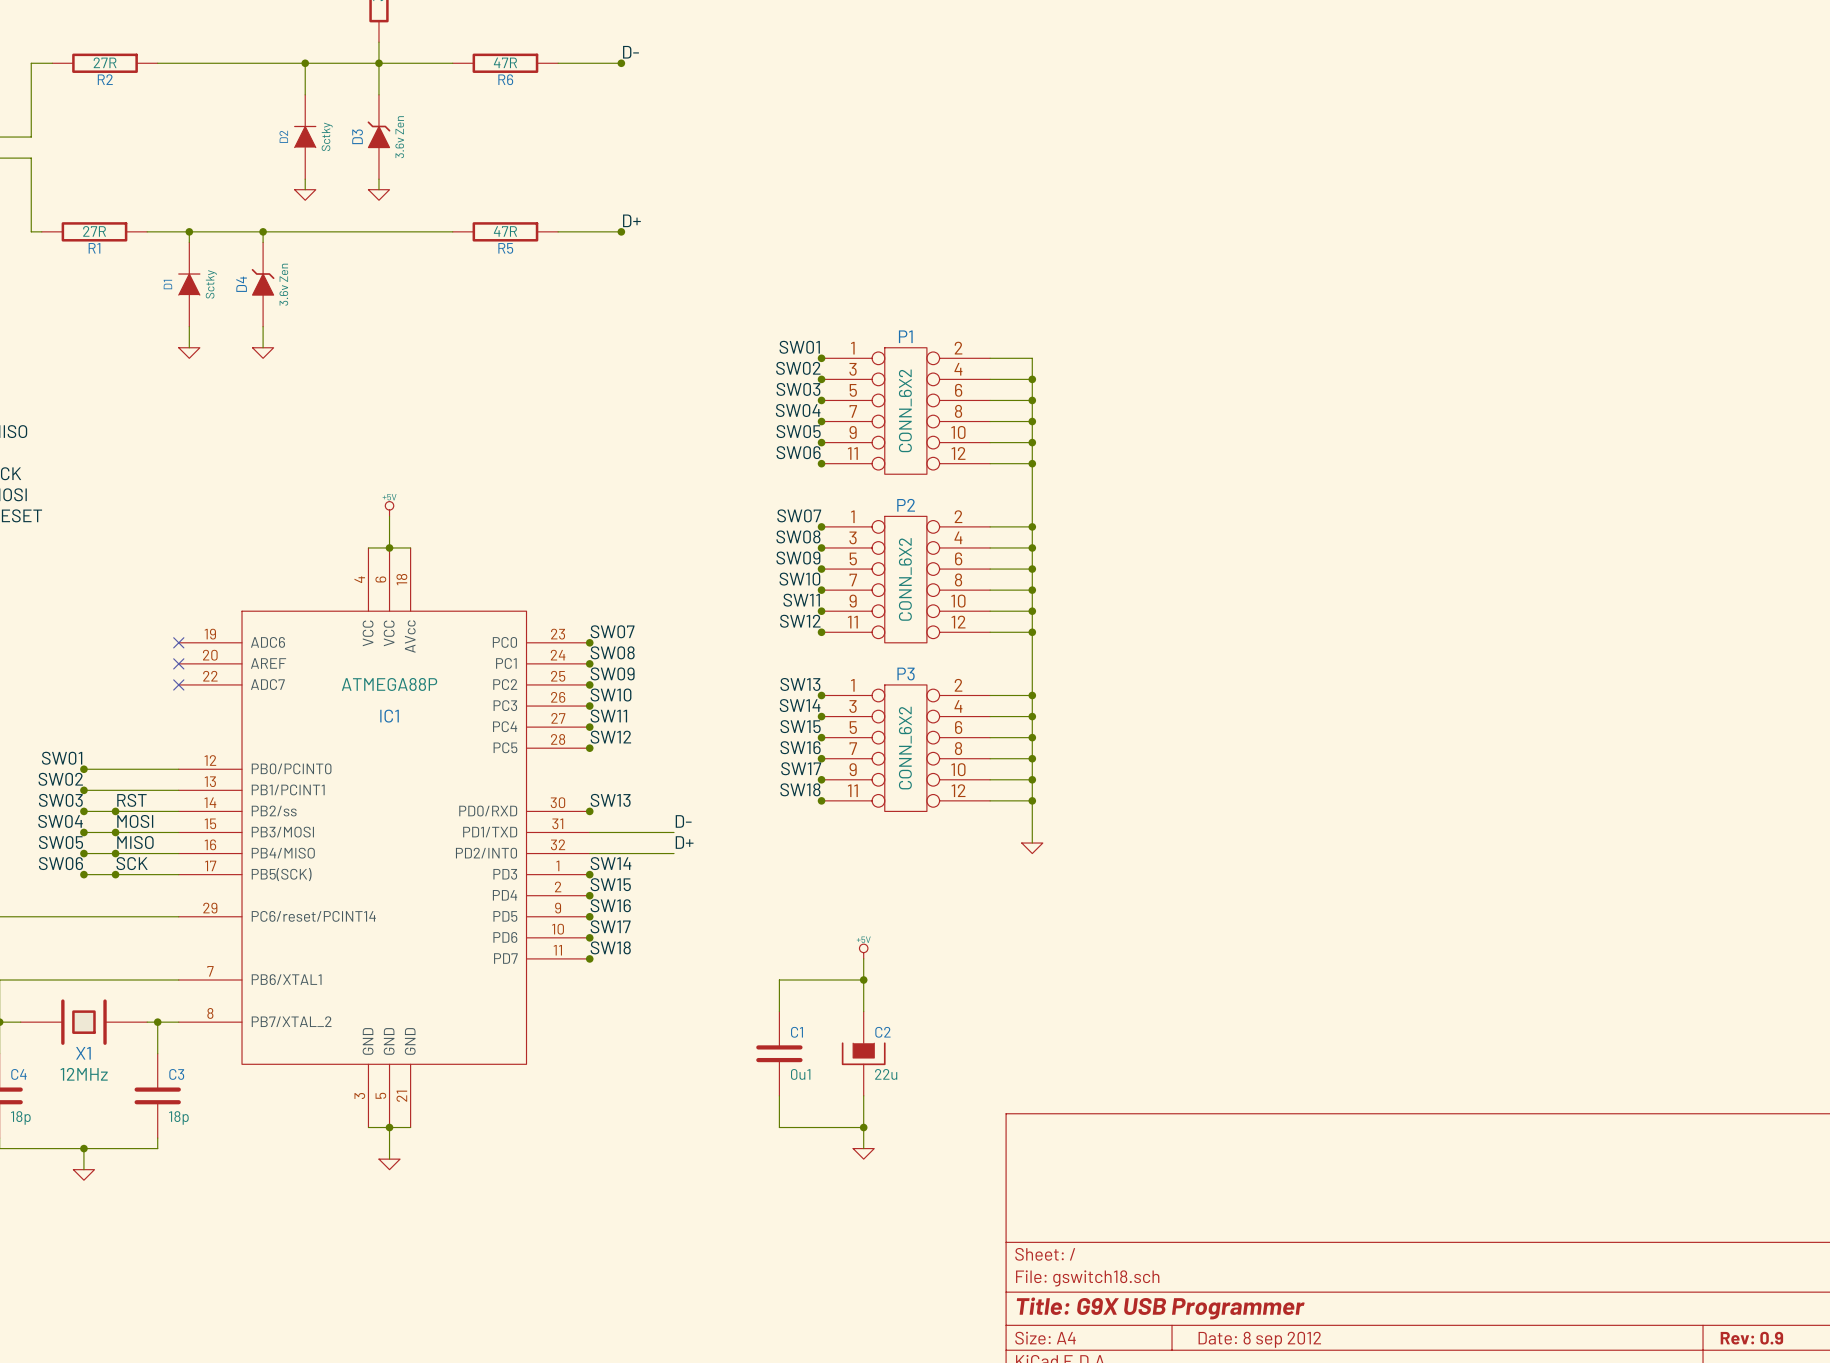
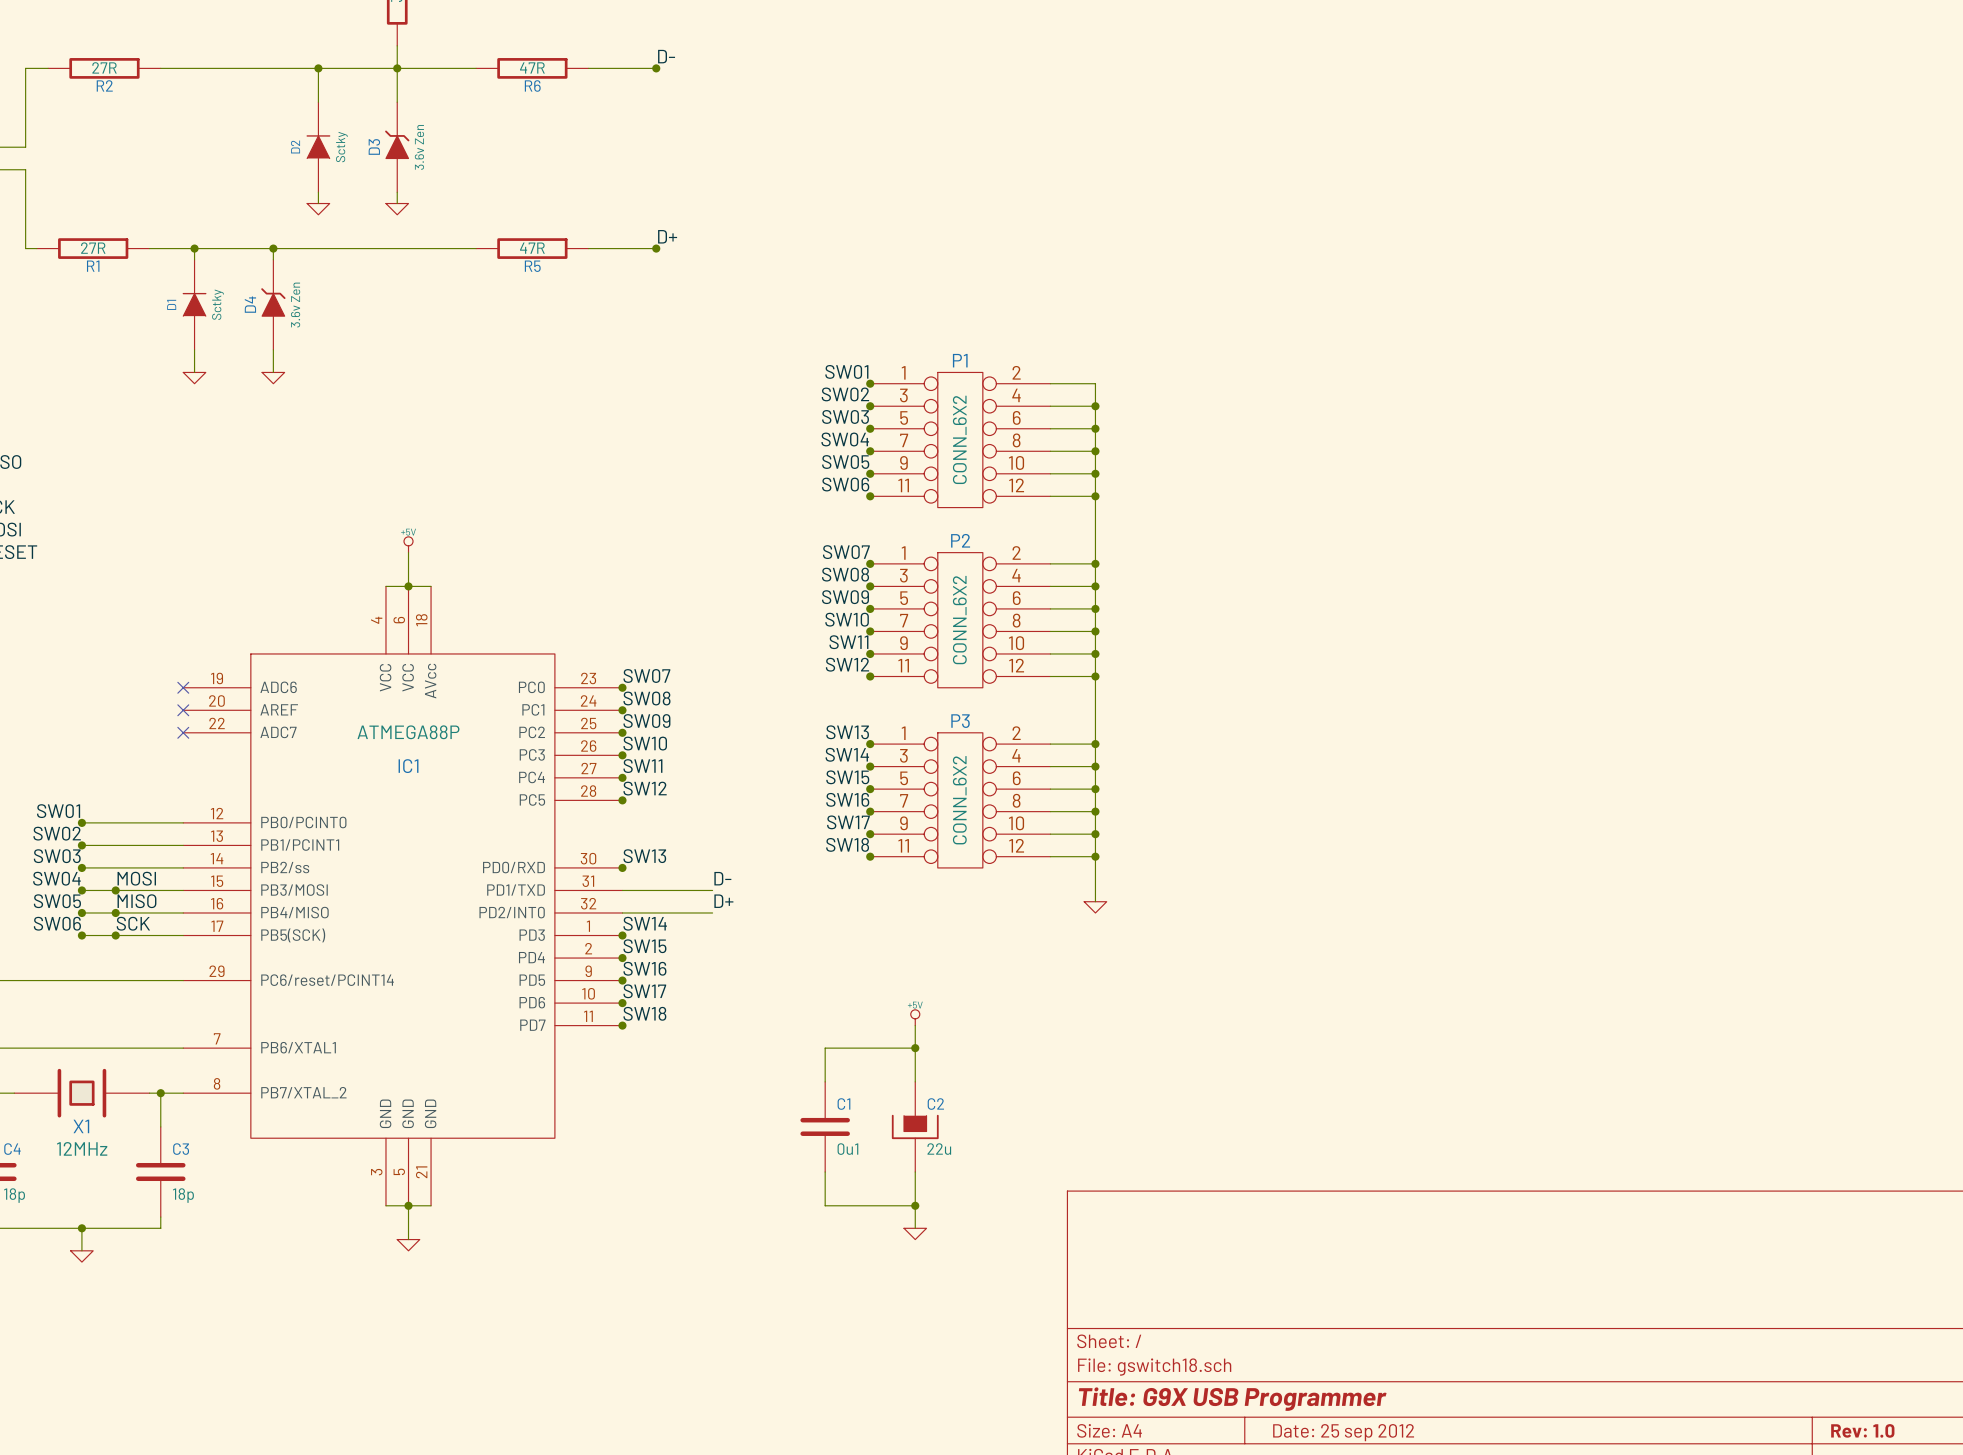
label: RST (131, 800) -> none
junction: (115, 811) -> none
title block: Rev: 0.9 (1751, 1338) -> Rev: 1.0 (1862, 1430)
title block: Date: 8 sep 2012 (1259, 1339) -> Date: 25 sep 2012 (1343, 1432)

